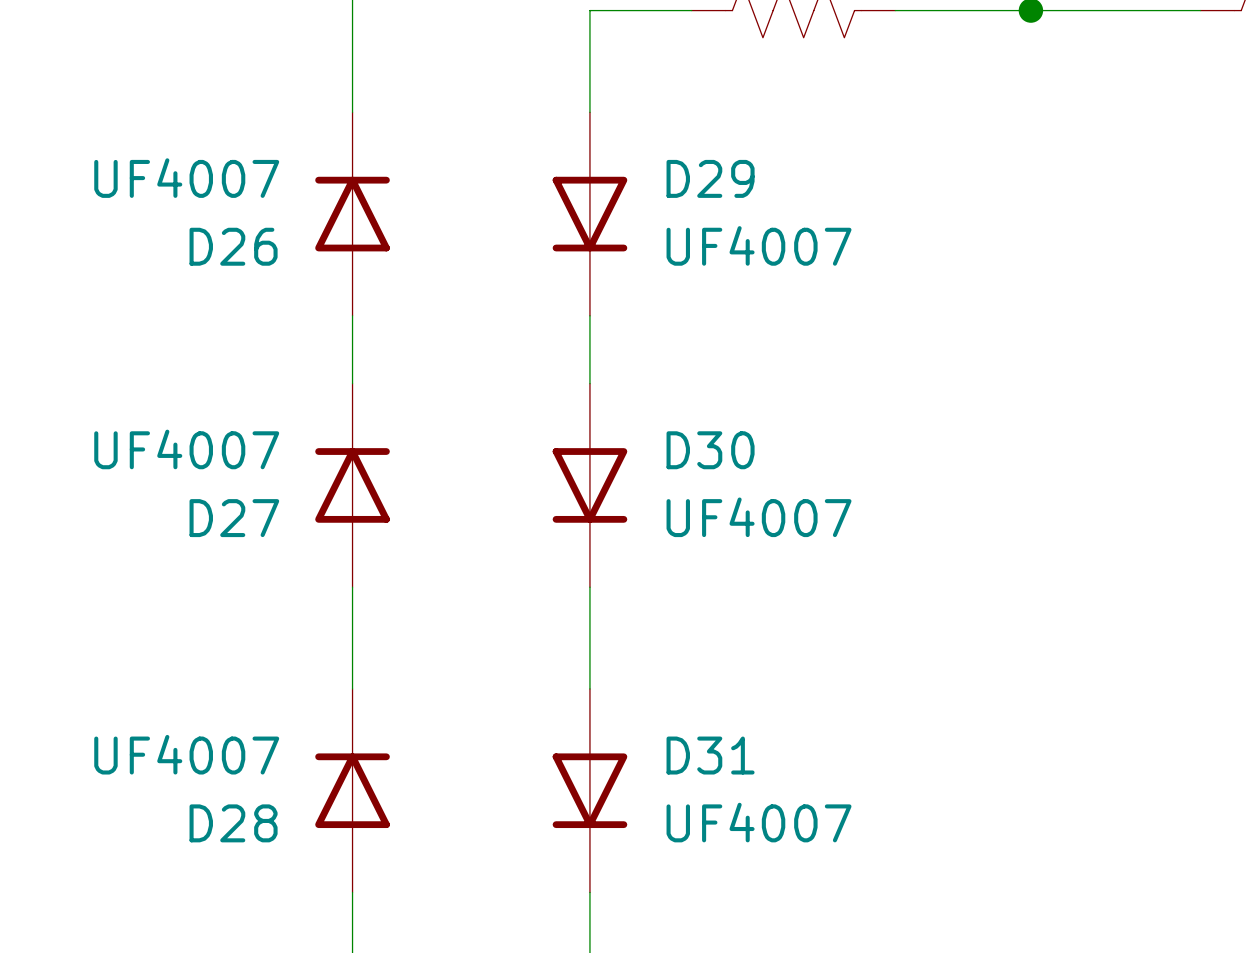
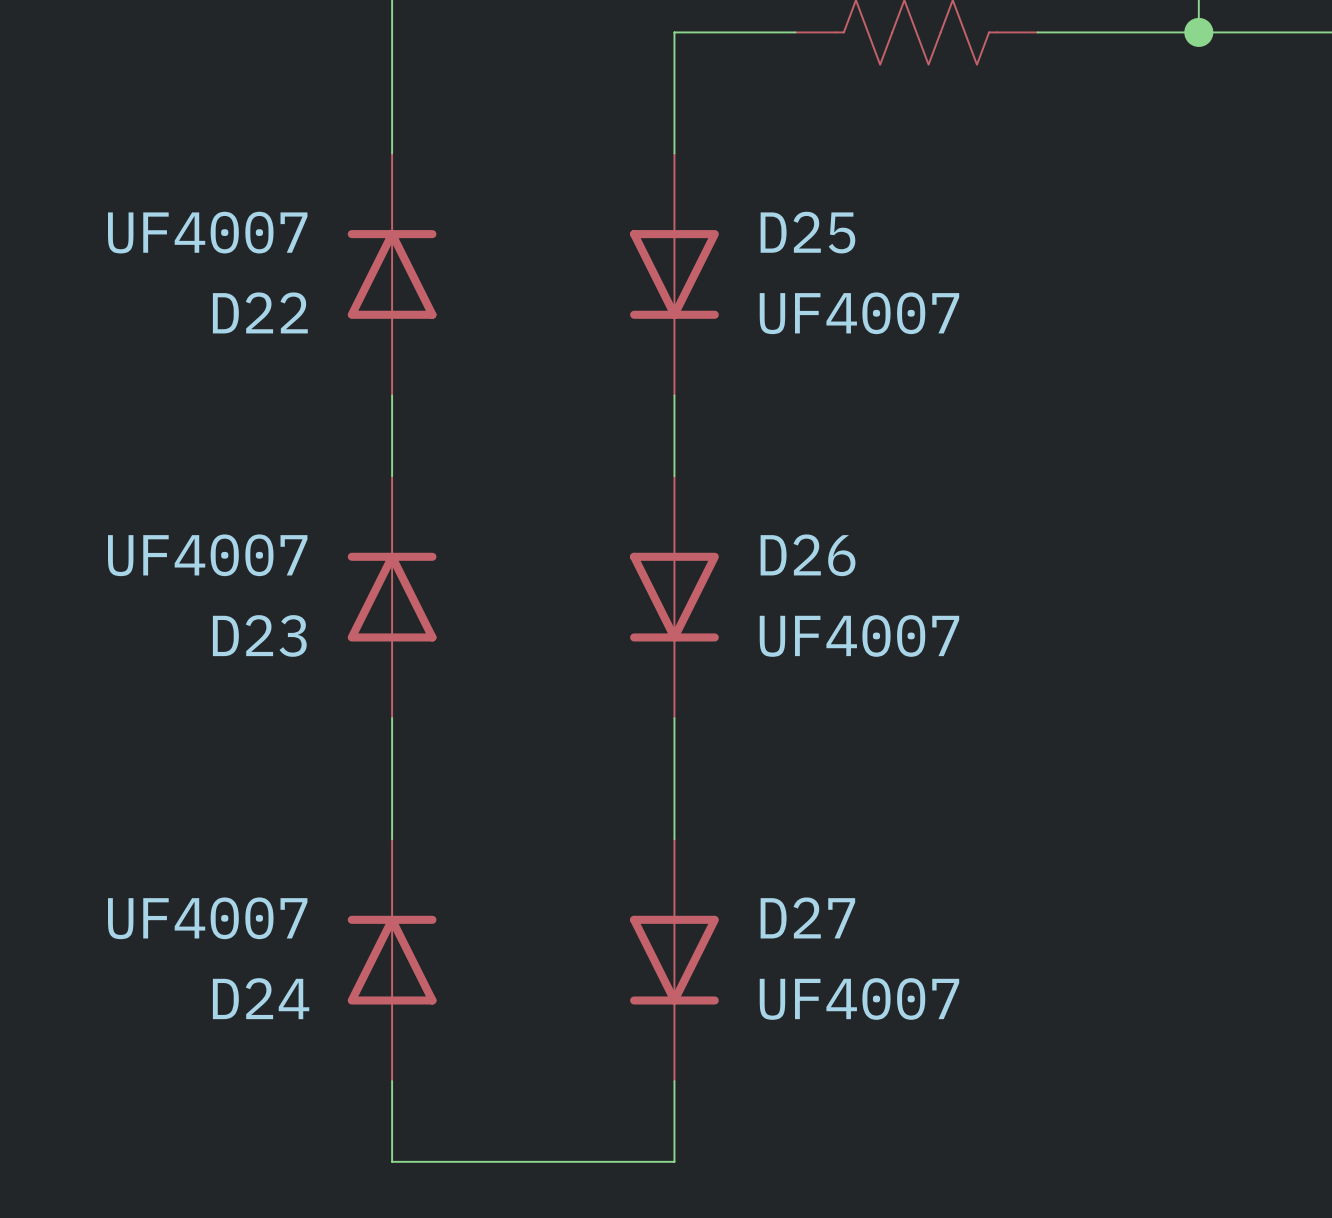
D29 name: D29 (710, 178) -> D25 (807, 232)
D26 name: D26 (233, 246) -> D22 (260, 312)
D30 name: D30 (710, 450) -> D26 (808, 555)
D27 name: D27 (234, 518) -> D23 (259, 635)
D31 name: D31 (710, 755) -> D27 (807, 917)
D28 name: D28 (233, 823) -> D24 (261, 998)

